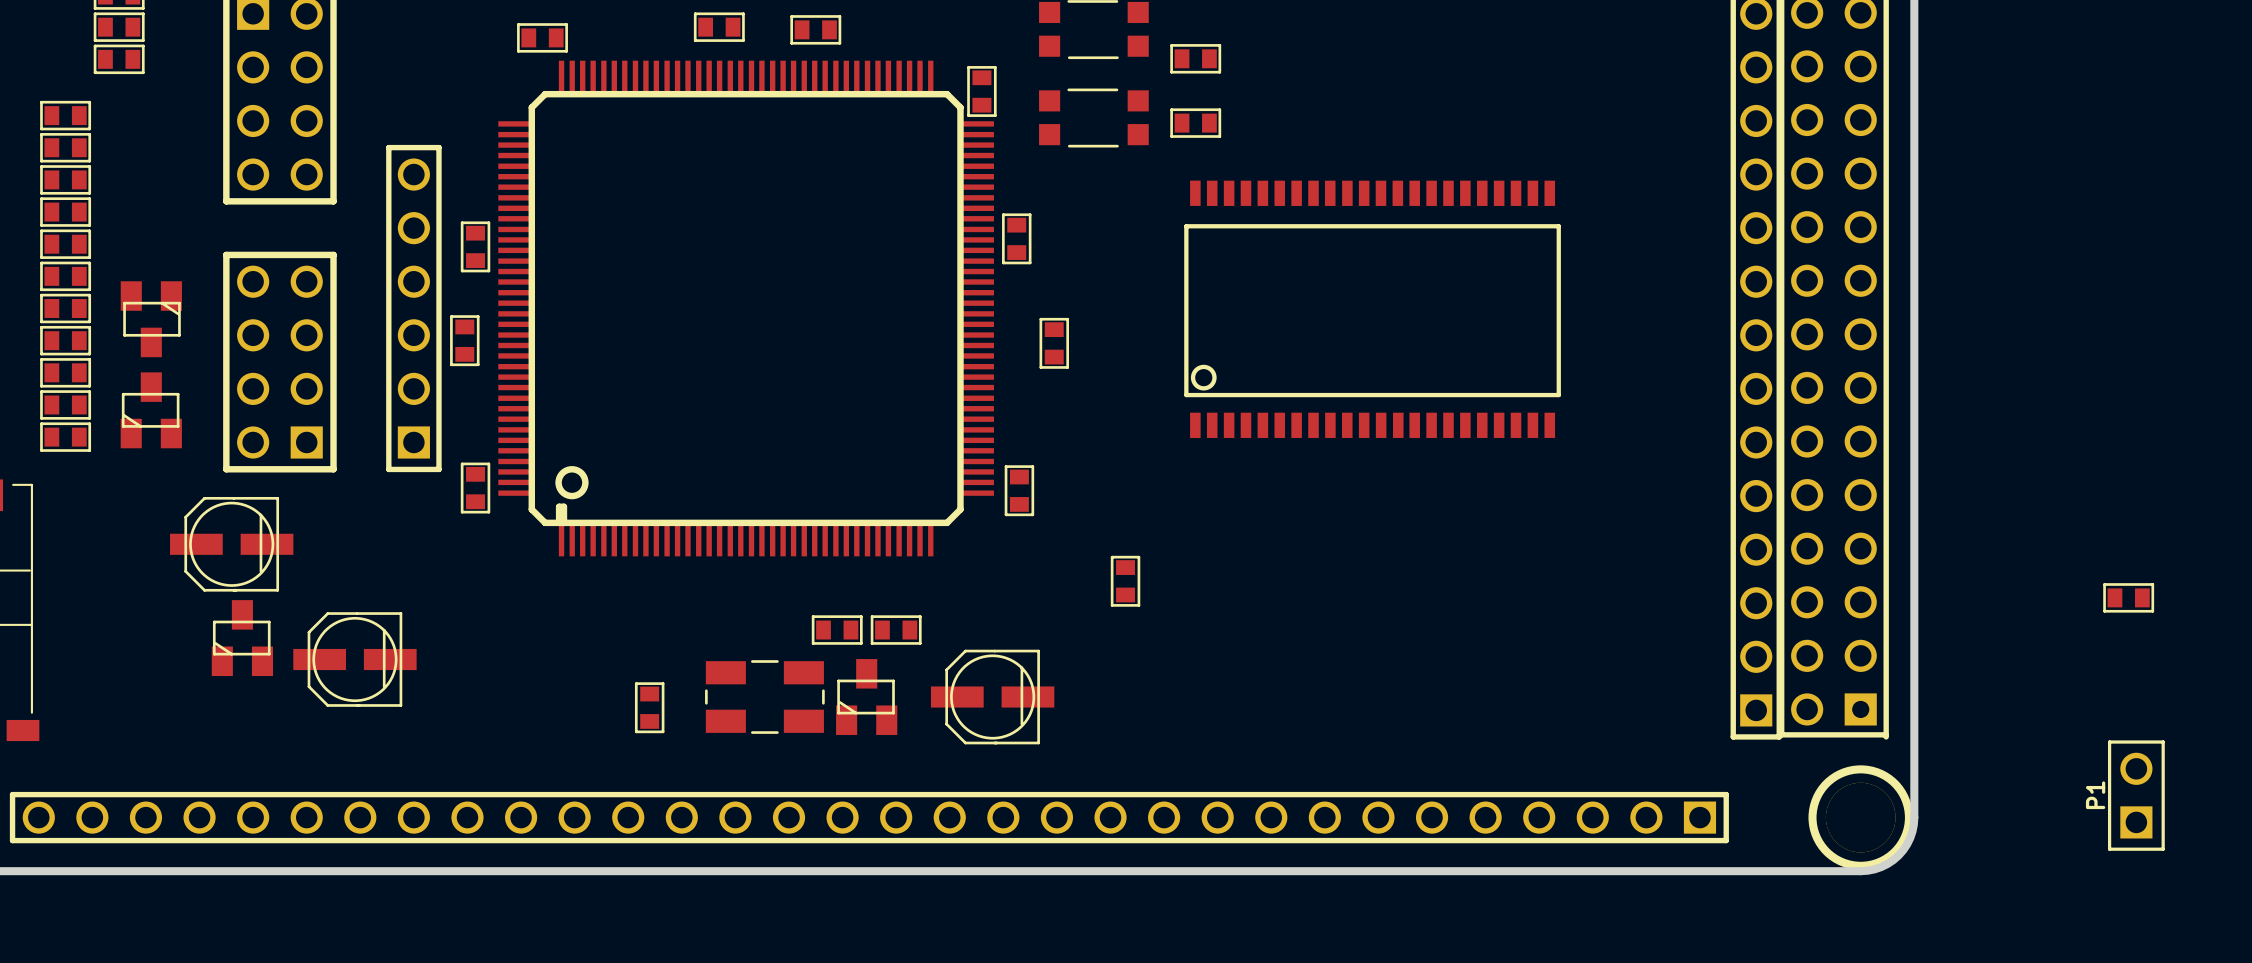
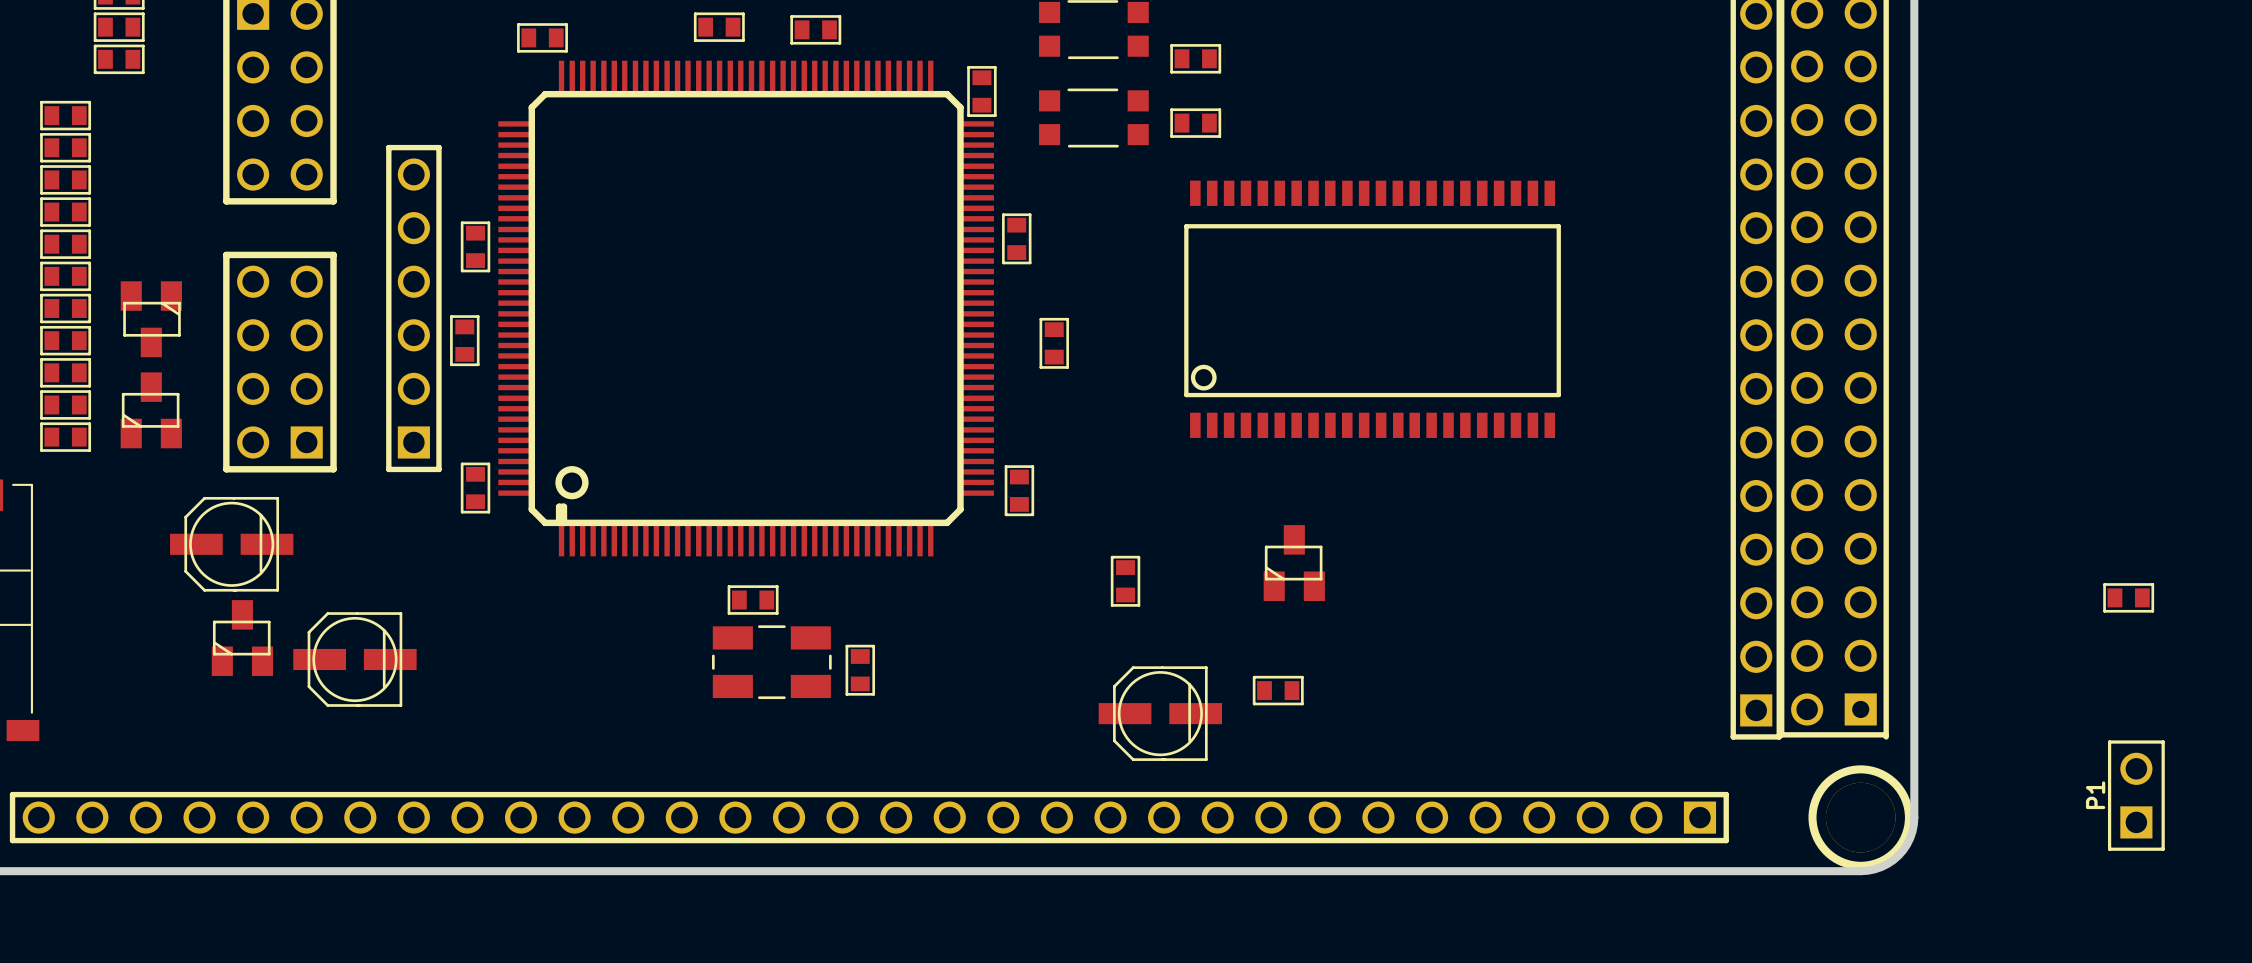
part: none -> (753, 600)
part: (837, 630) -> none
part: (896, 630) -> none
part: none -> (860, 670)
part: none -> (1278, 690)
part position: (764, 697) -> (771, 662)
part position: (866, 697) -> (1294, 563)
part position: (992, 697) -> (1160, 713)
part: (649, 707) -> none

